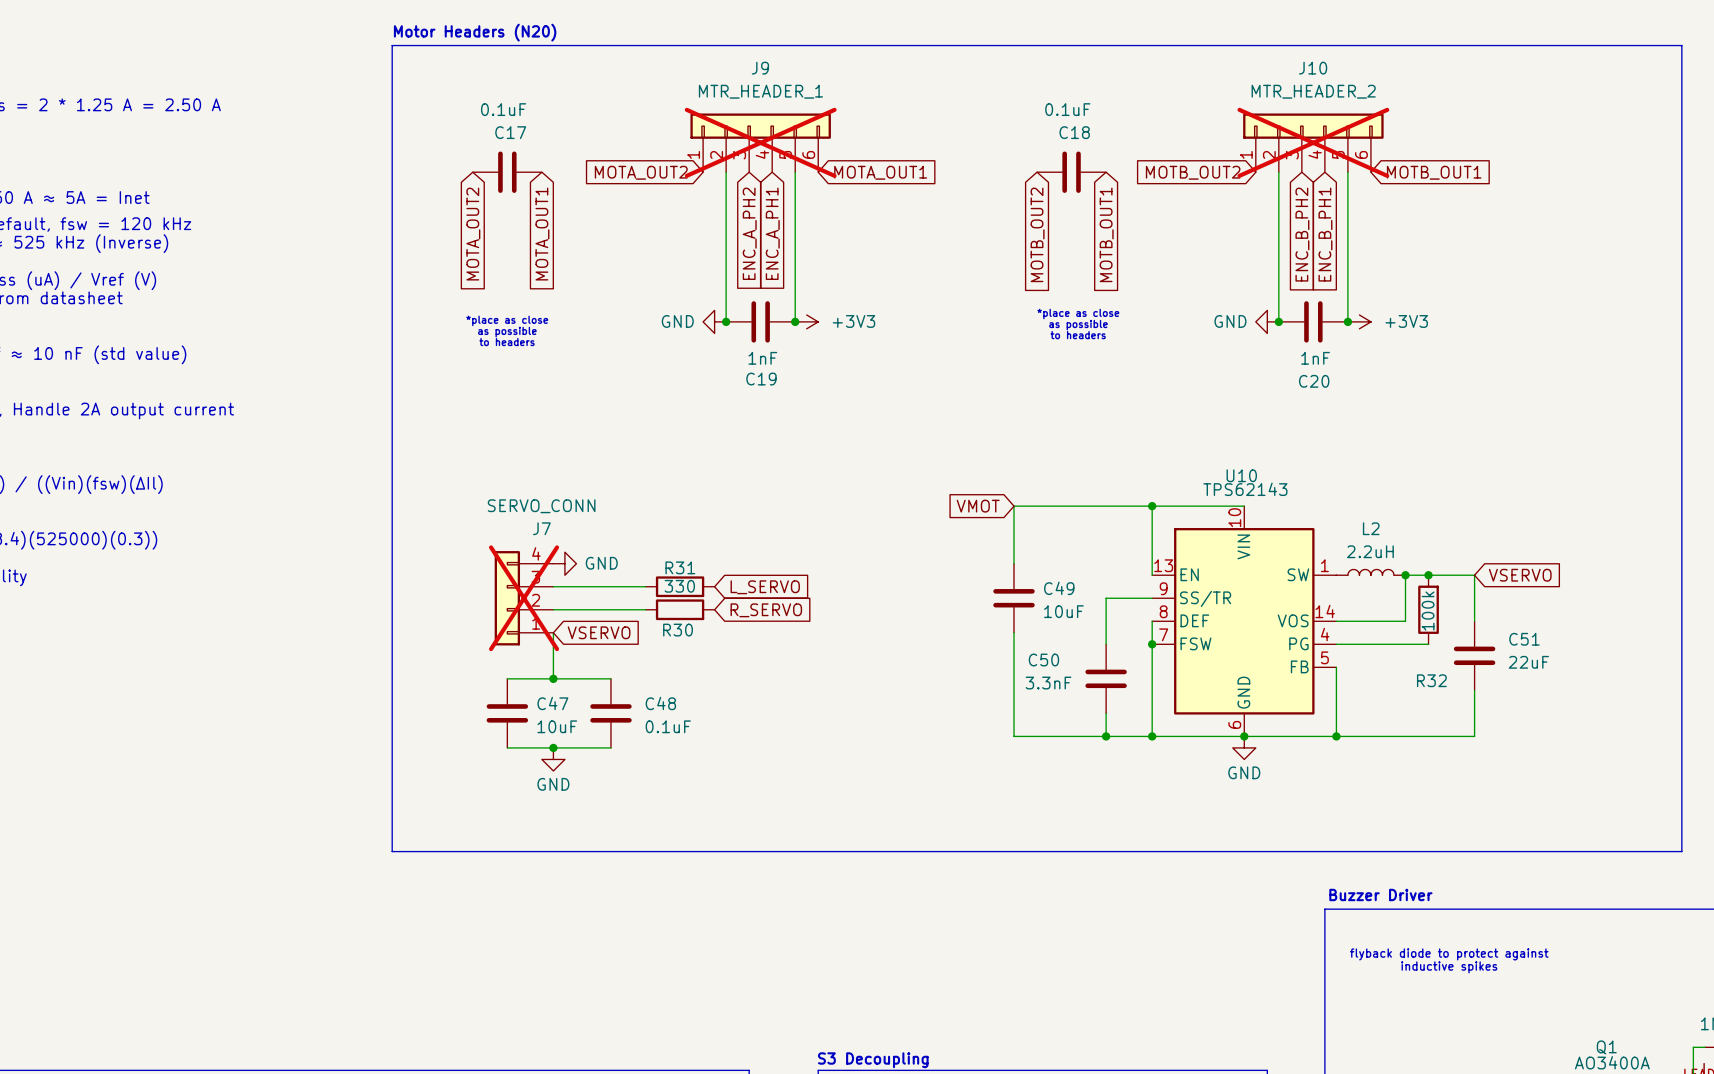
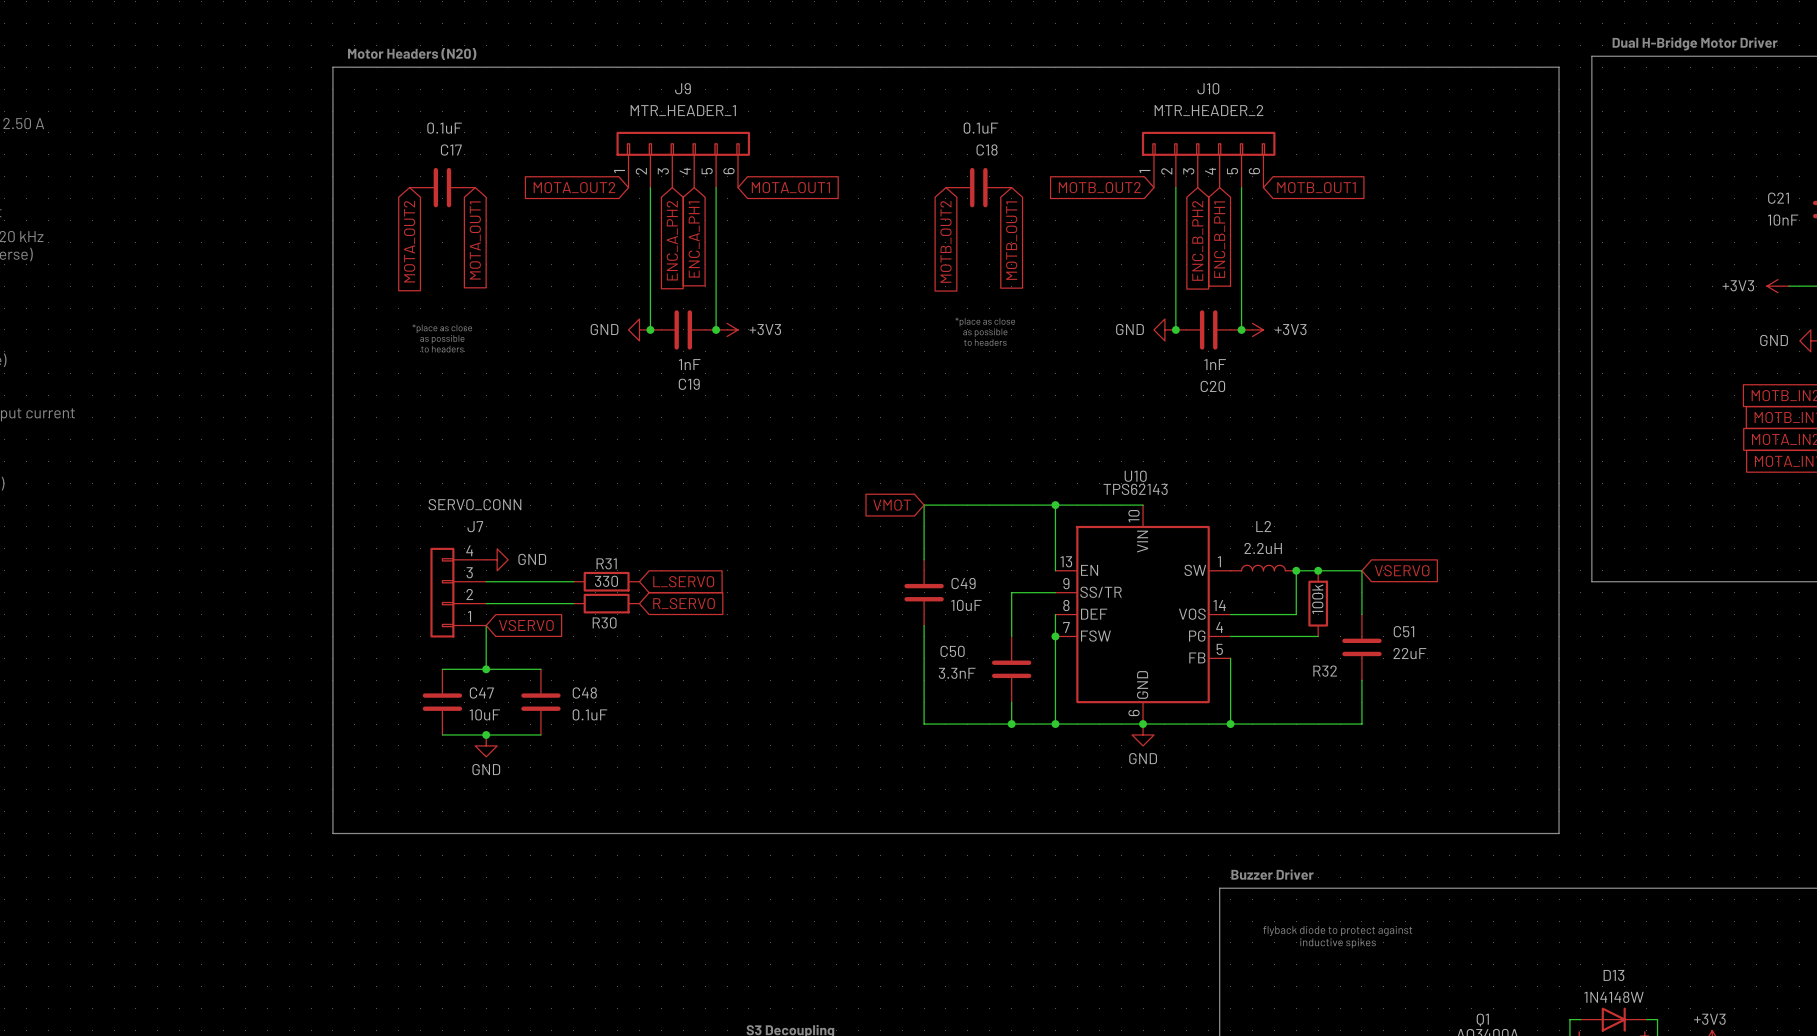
J9 do-not-place cross: (760, 142) -> none
J10 do-not-place cross: (1313, 142) -> none
J7 do-not-place cross: (524, 598) -> none

